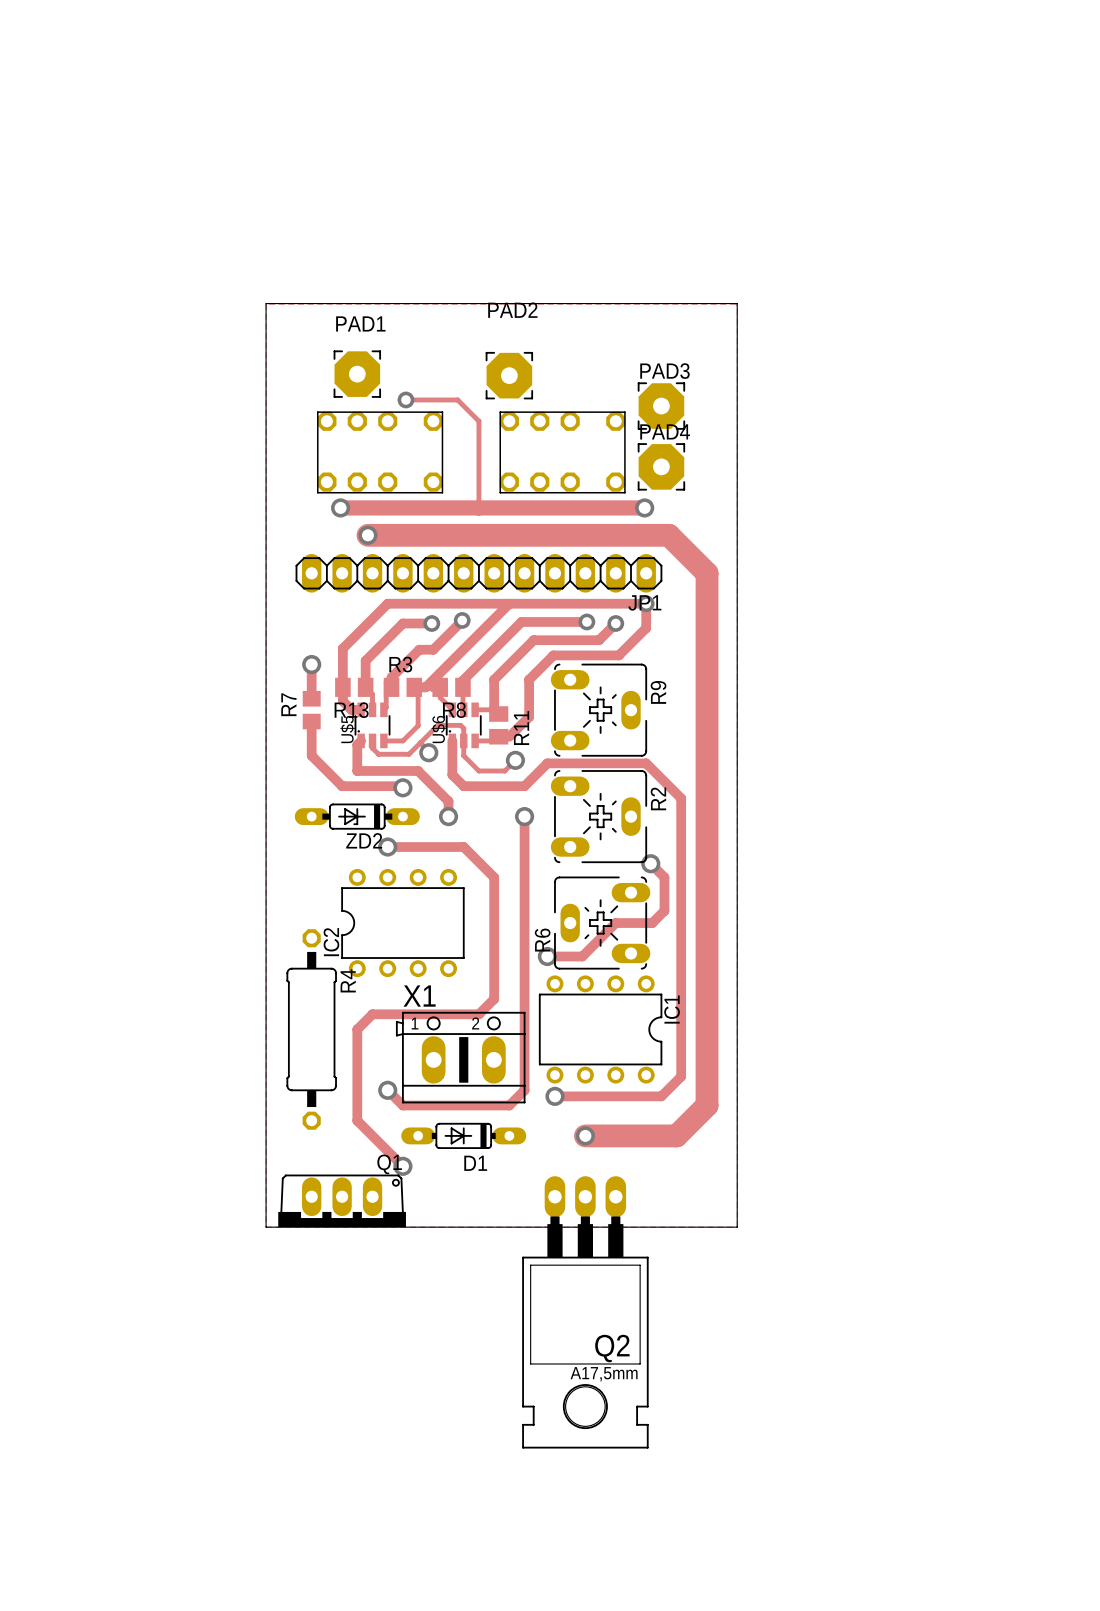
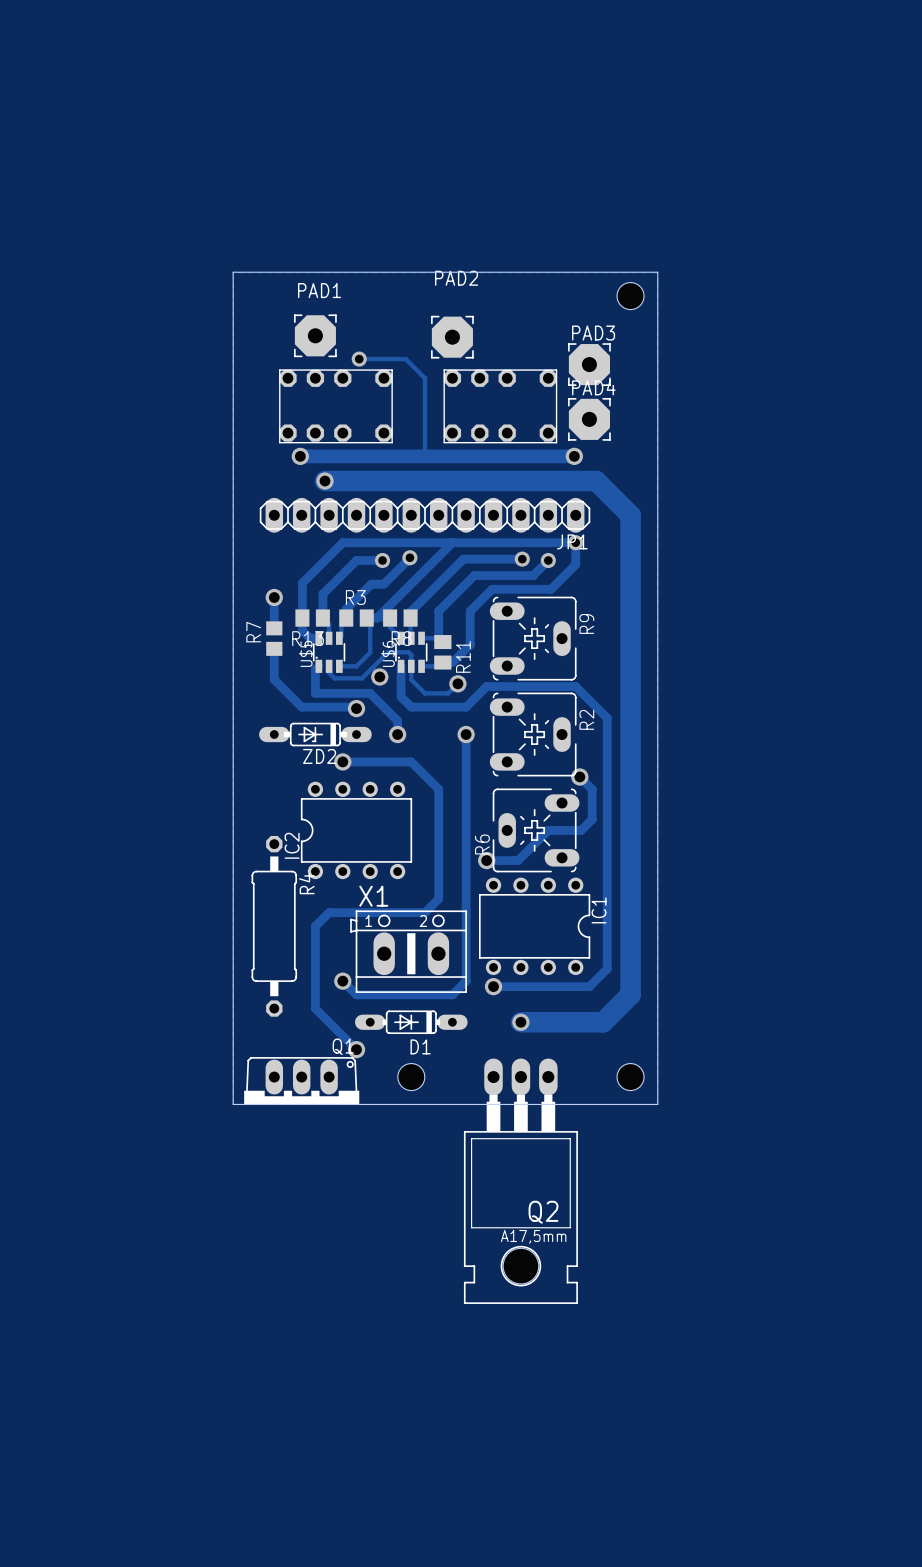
hole: none -> (630, 296)
hole: none -> (411, 1077)
hole: none -> (630, 1077)

